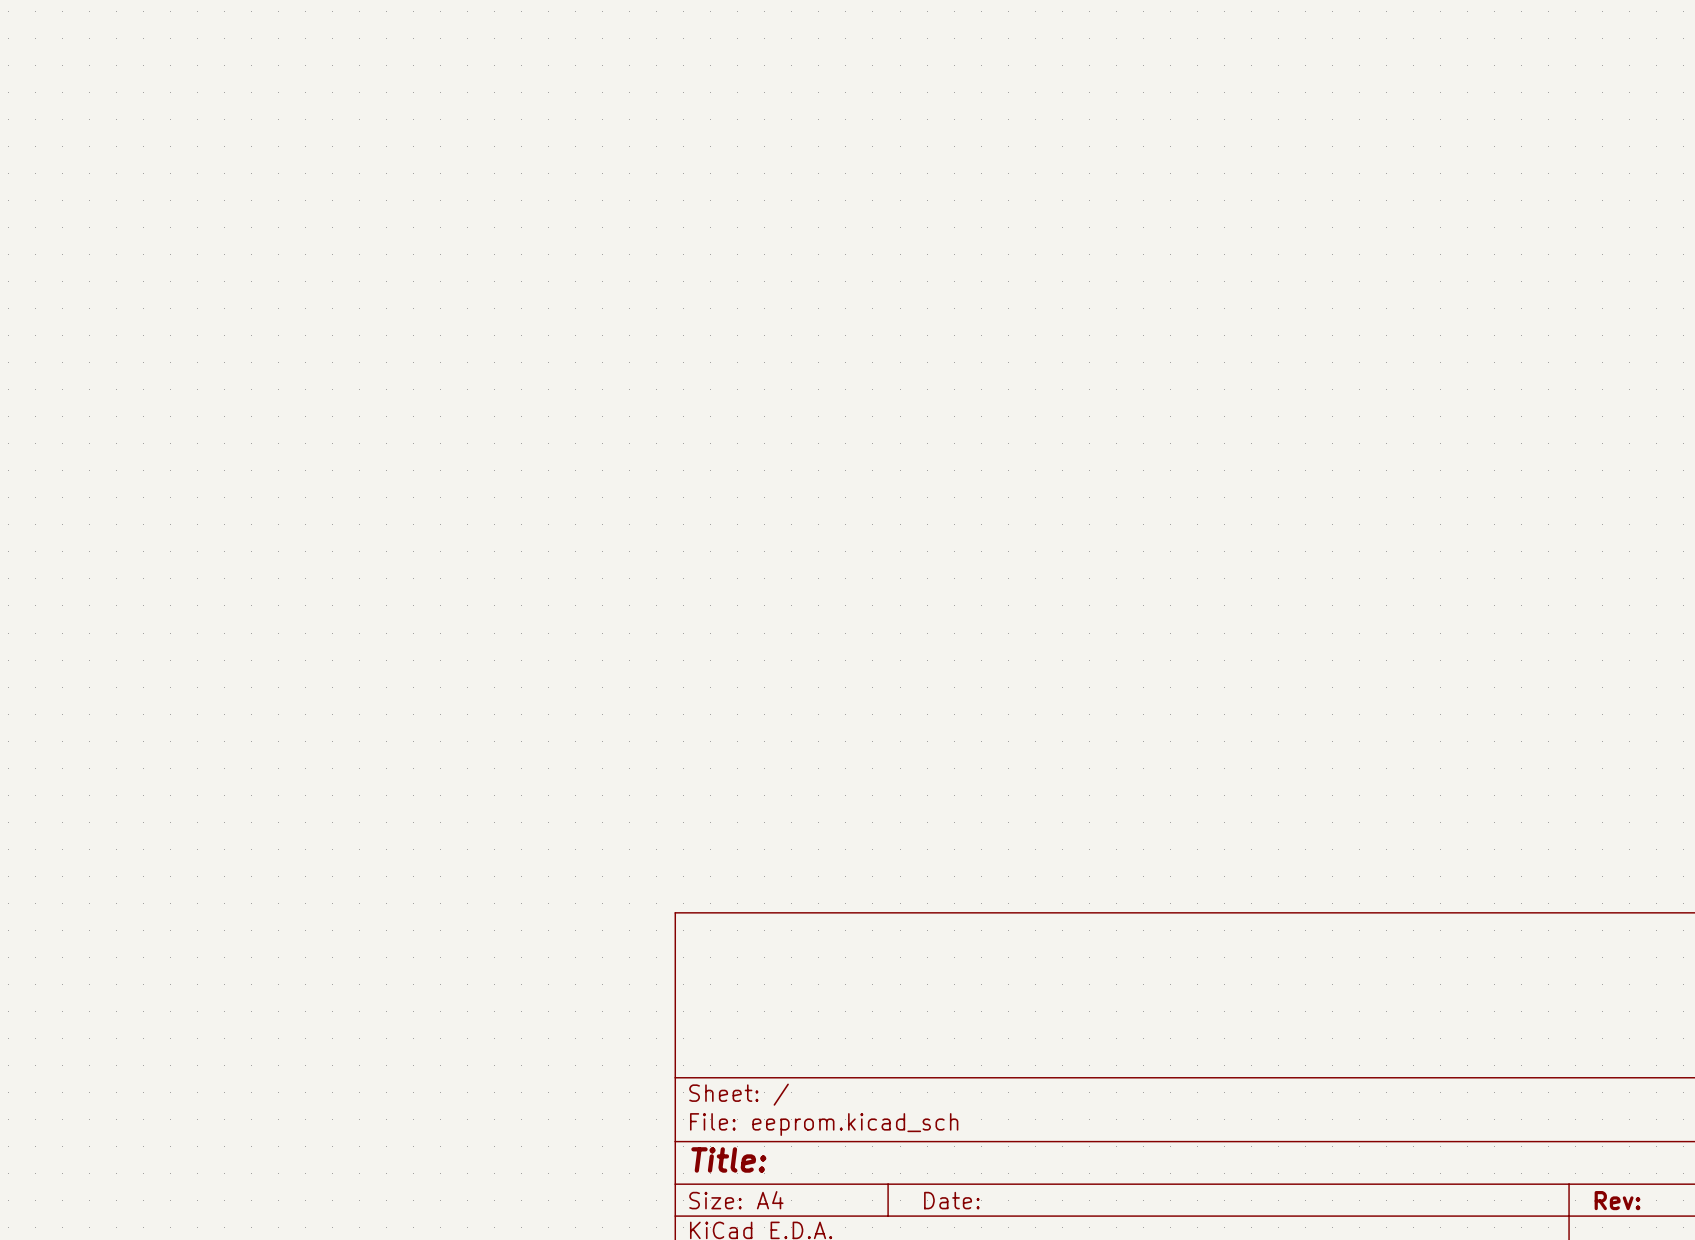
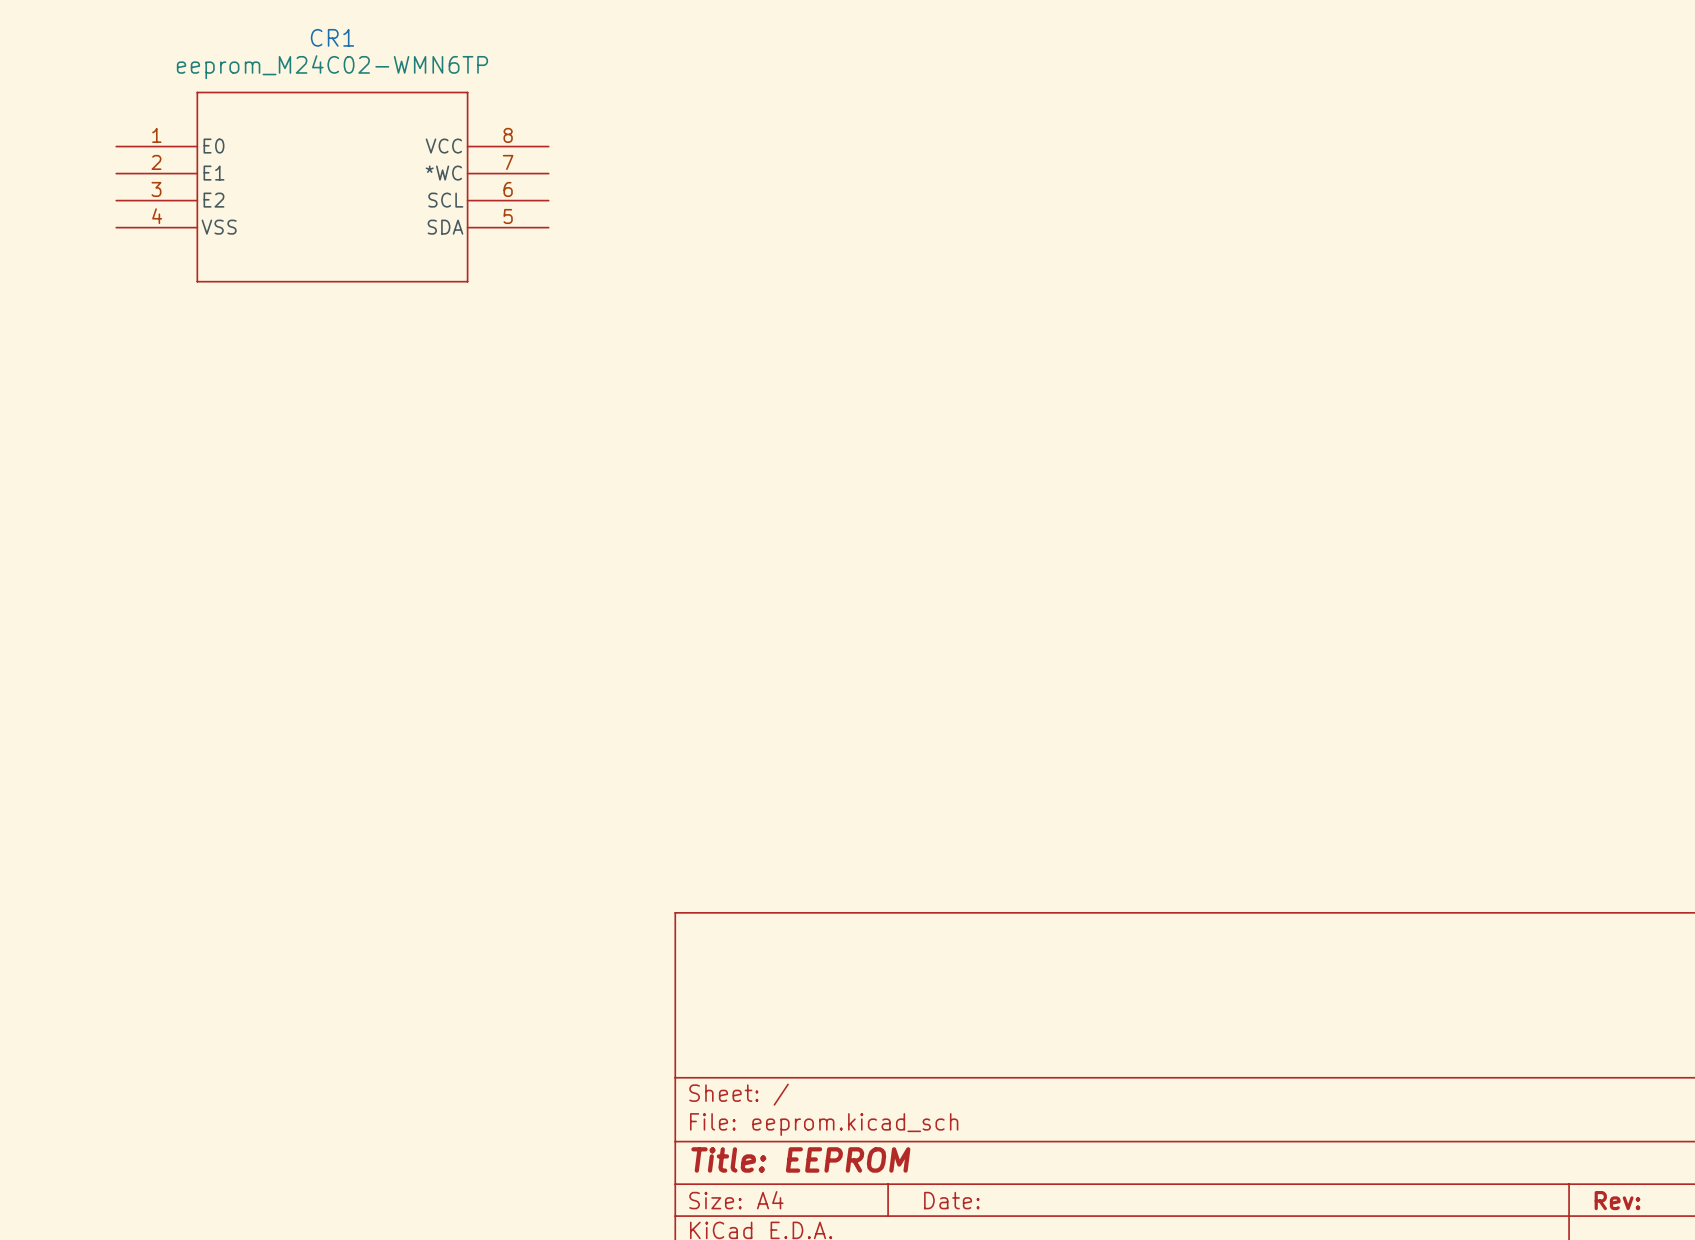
CR1: none -> eeprom_M24C02-WMN6TP (332, 187)
title block: Title: (728, 1159) -> Title: EEPROM (800, 1159)

